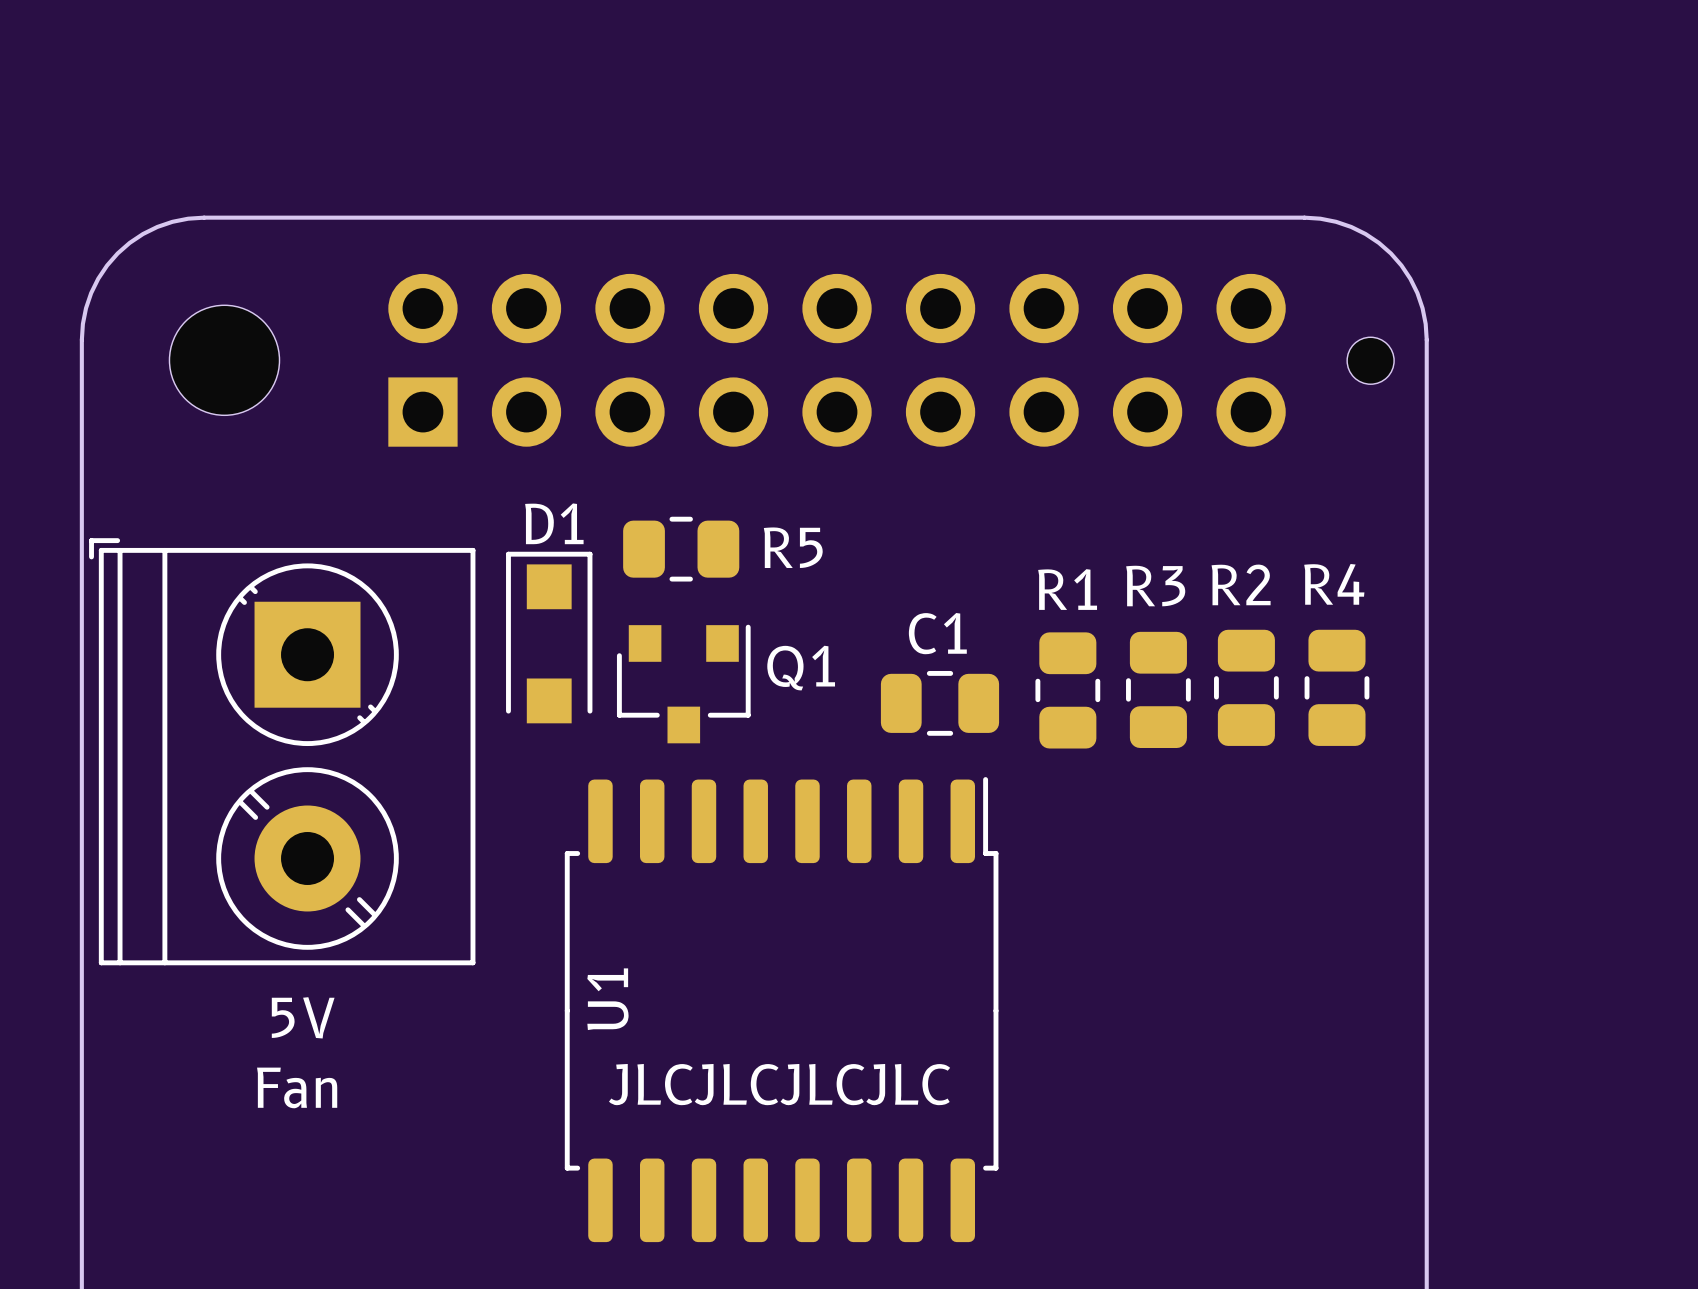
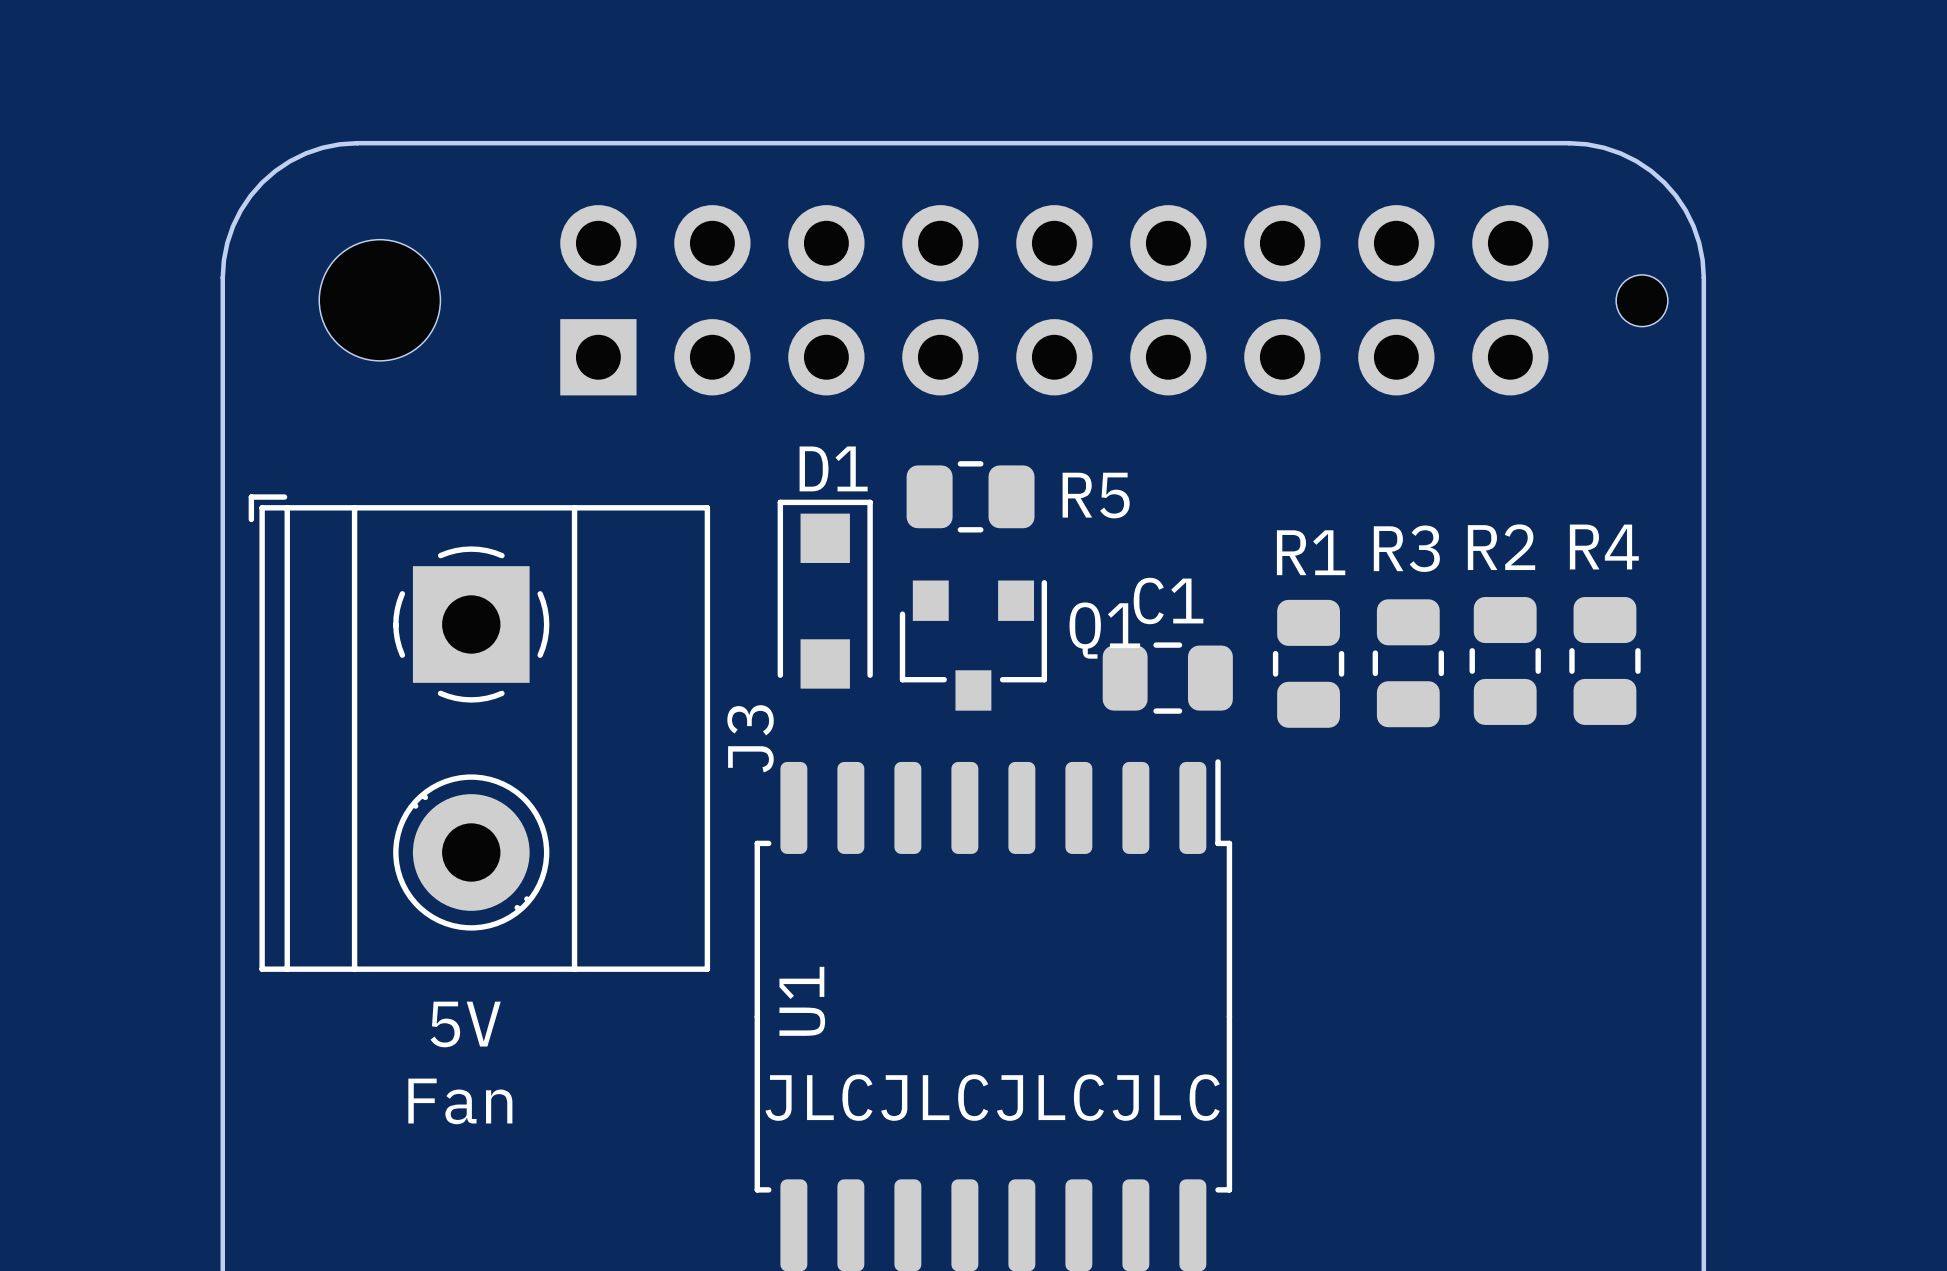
R5 position: (681, 549) -> (970, 496)
D1 position: (549, 637) -> (825, 594)
Q1 position: (683, 684) -> (973, 645)
part: (282, 751) -> none
J3: none -> (479, 733)

